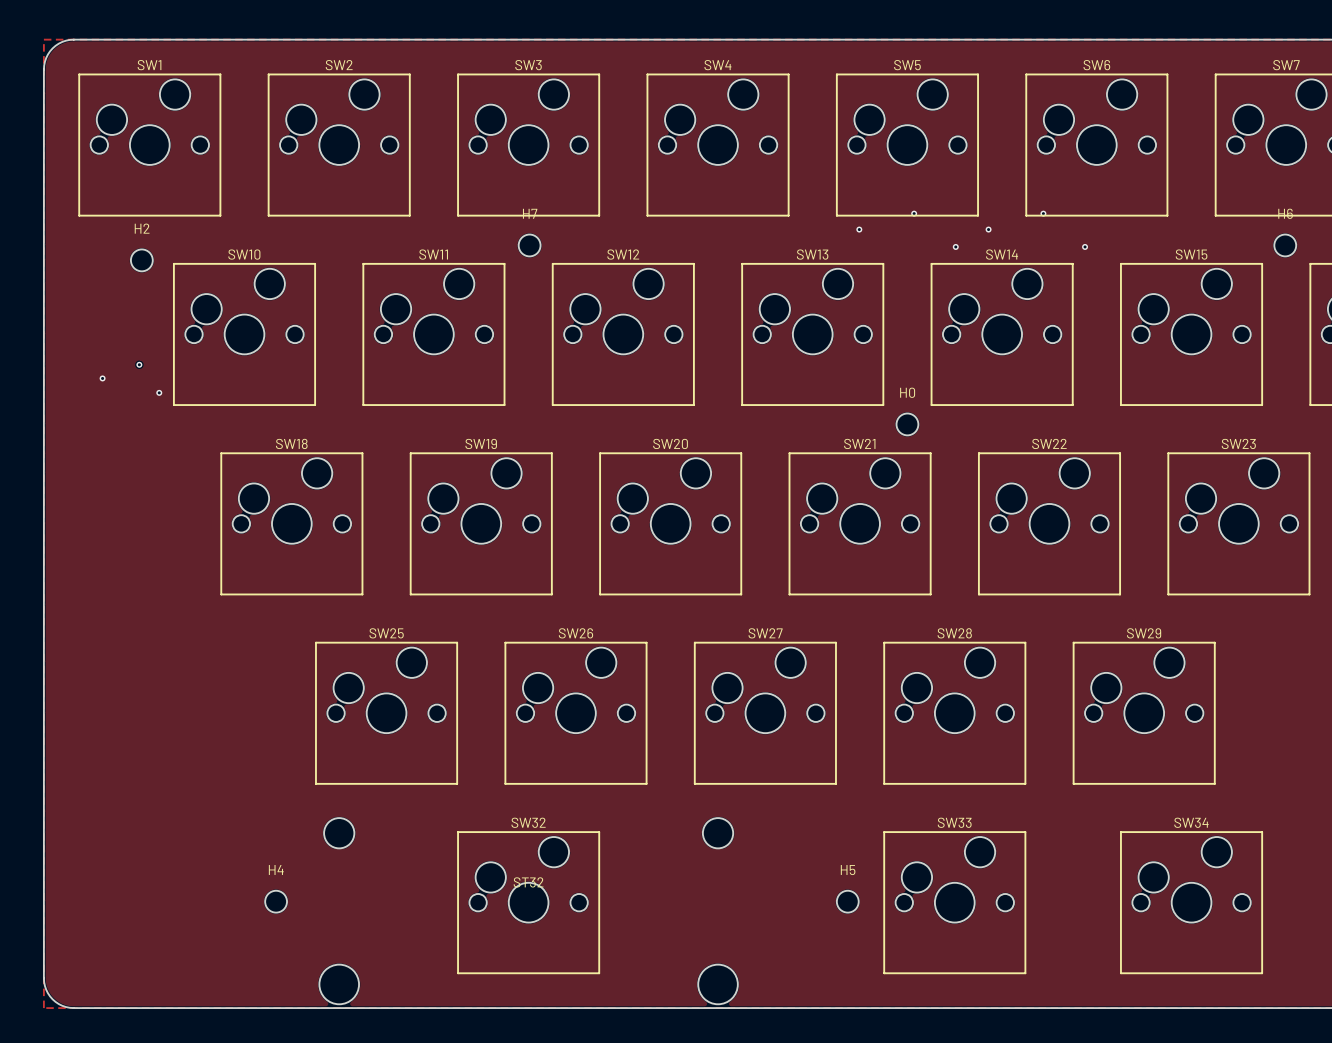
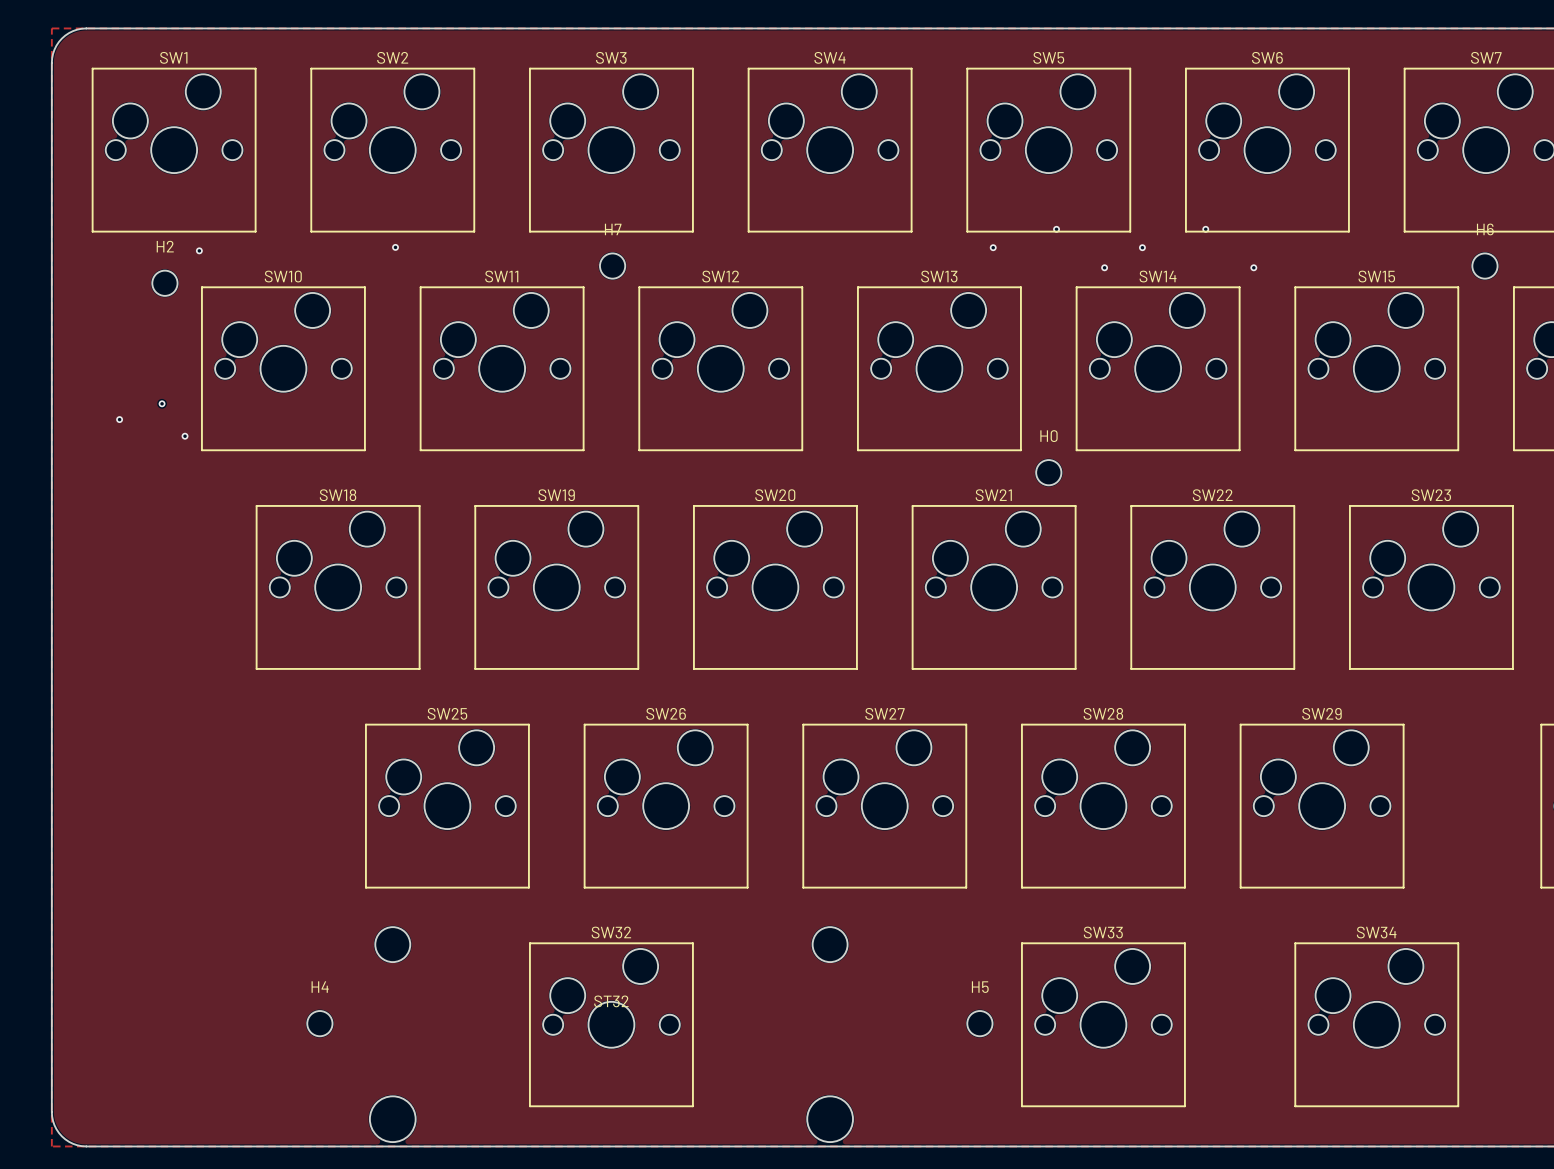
via: none -> (395, 247)
via: none -> (199, 250)

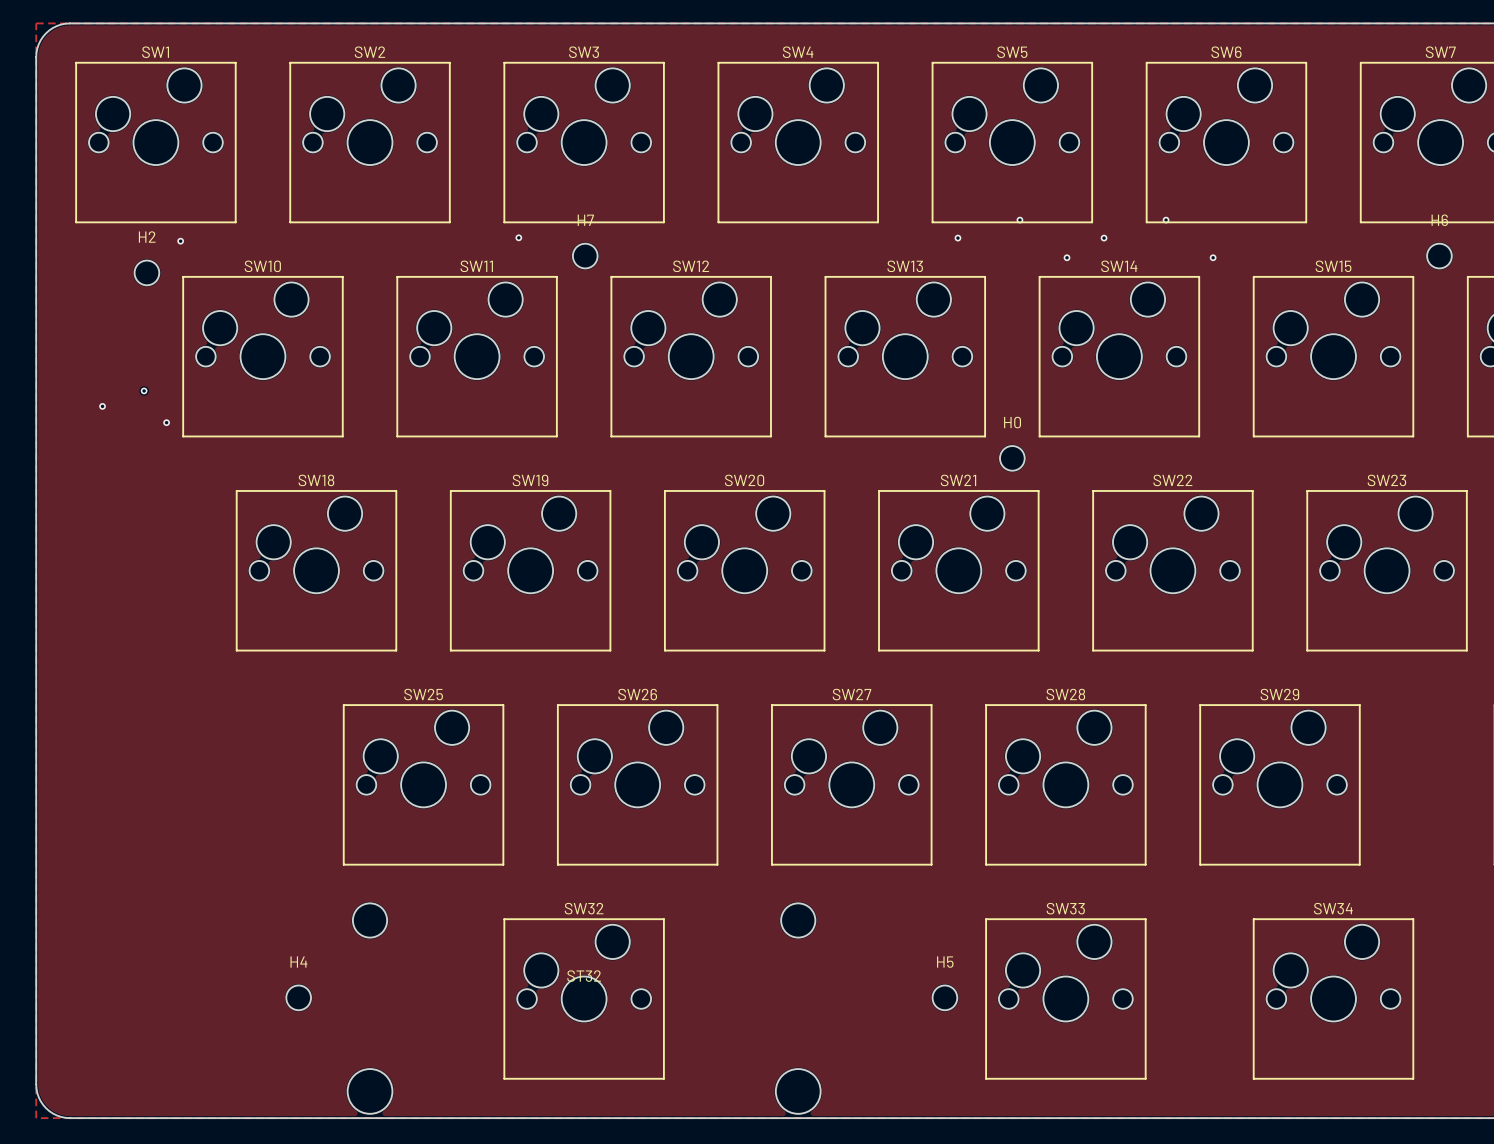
via: (395, 247) -> none
via: none -> (518, 237)

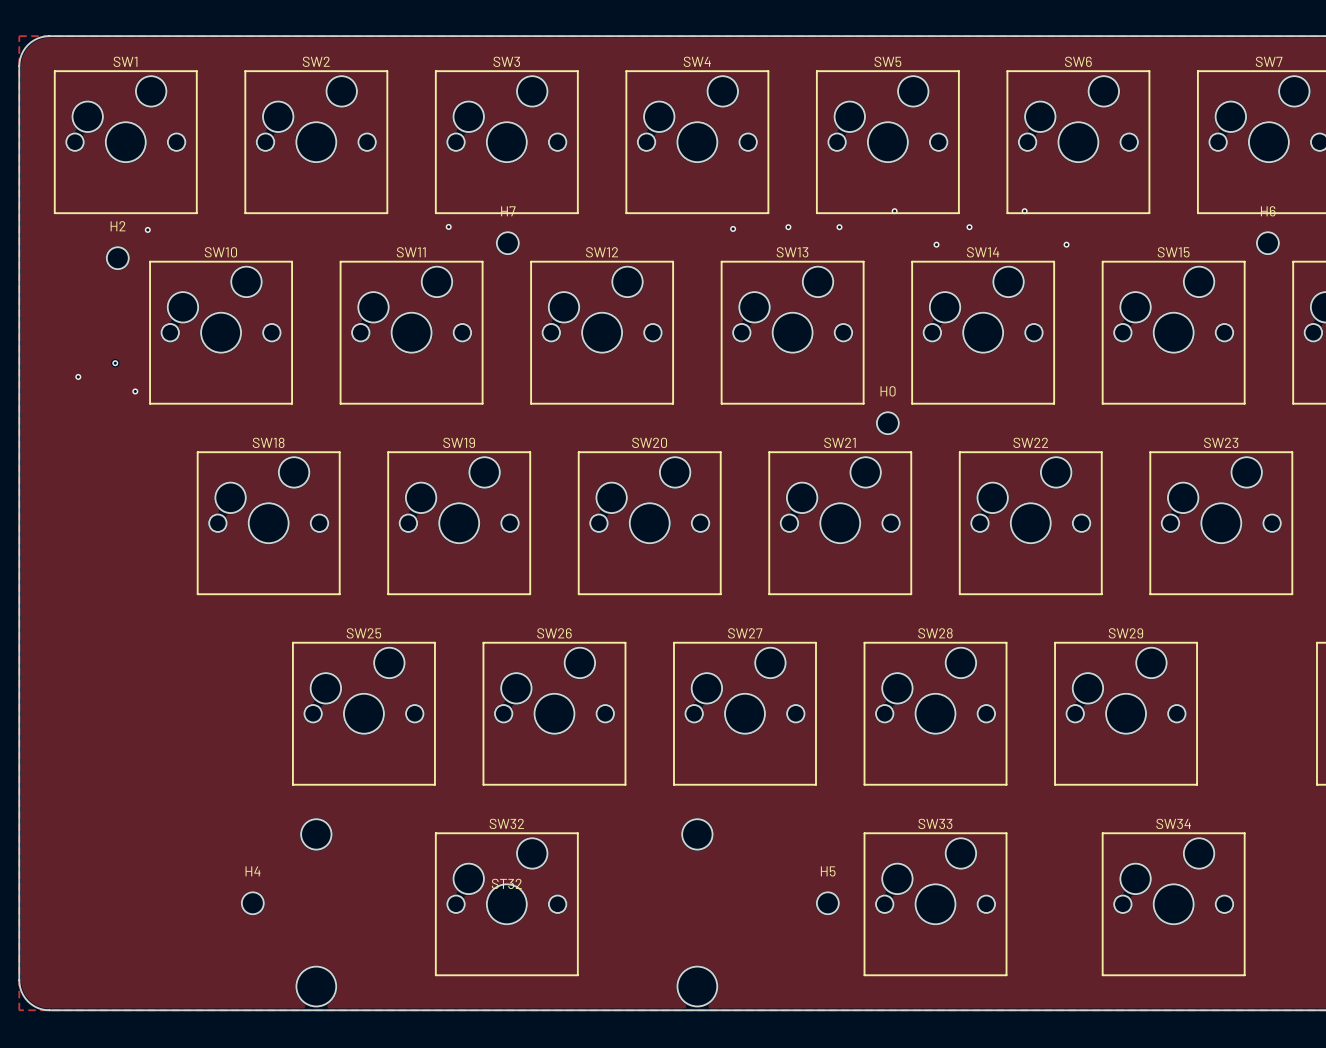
via: none -> (788, 227)
via: none -> (733, 228)

